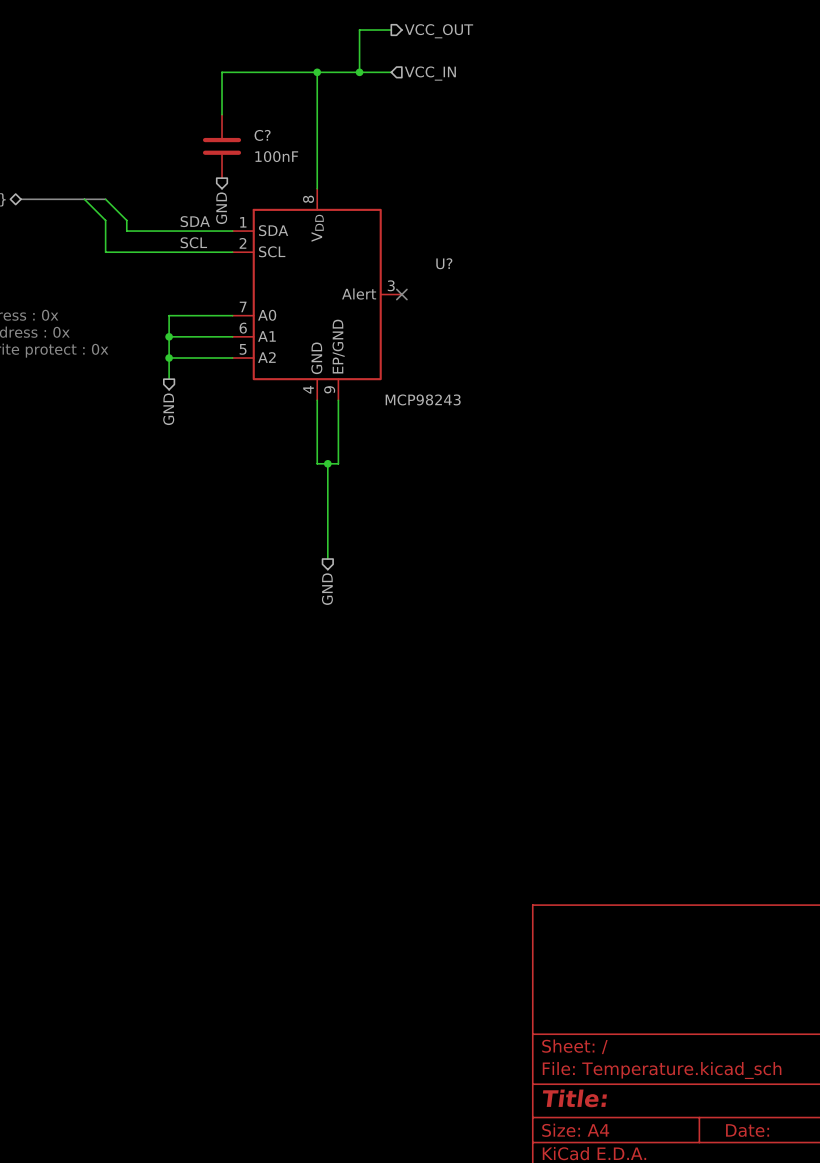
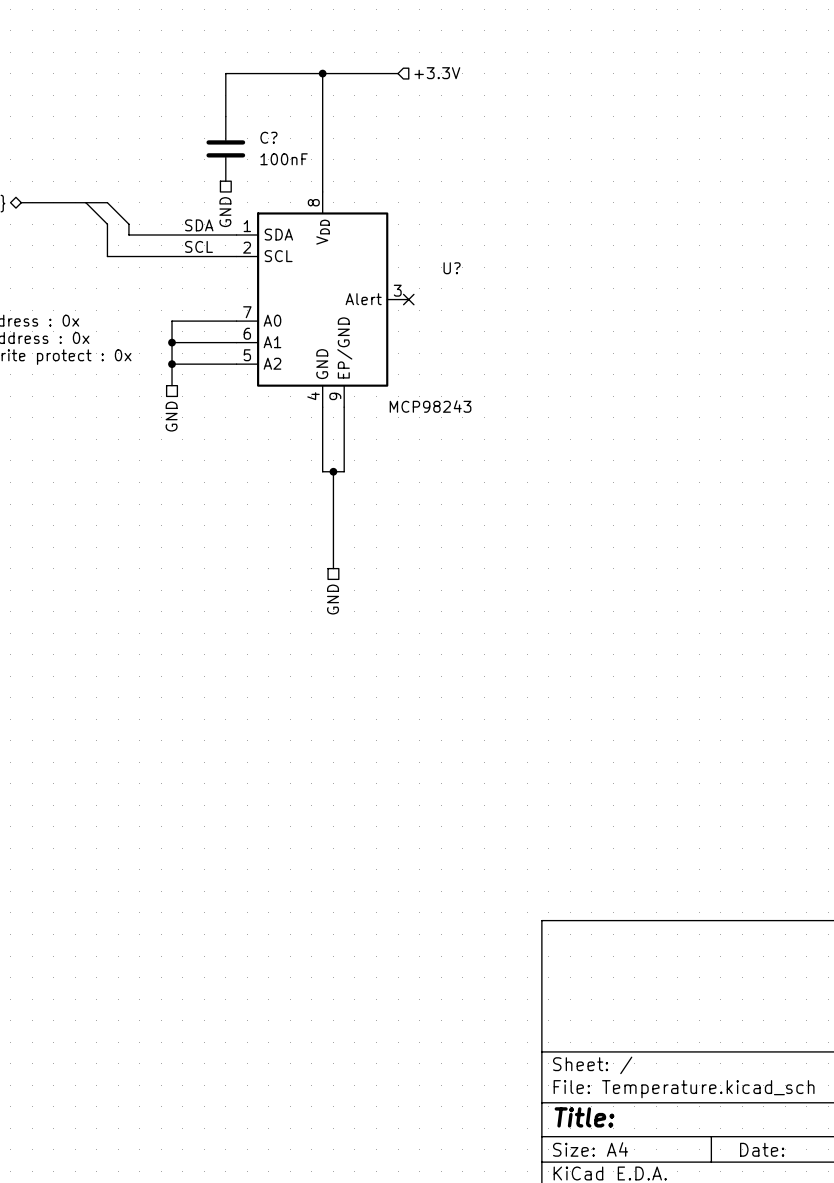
wire: (391, 30) (359, 30) (359, 72) -> none
hierarchical label: VCC_OUT (438, 31) -> none
junction: (359, 72) -> none
hierarchical label: VCC_IN (430, 73) -> +3.3V (437, 73)
hierarchical label shape: output (221, 208) -> passive (225, 212)
hierarchical label shape: output (168, 409) -> passive (171, 416)
hierarchical label shape: output (327, 589) -> passive (333, 599)

